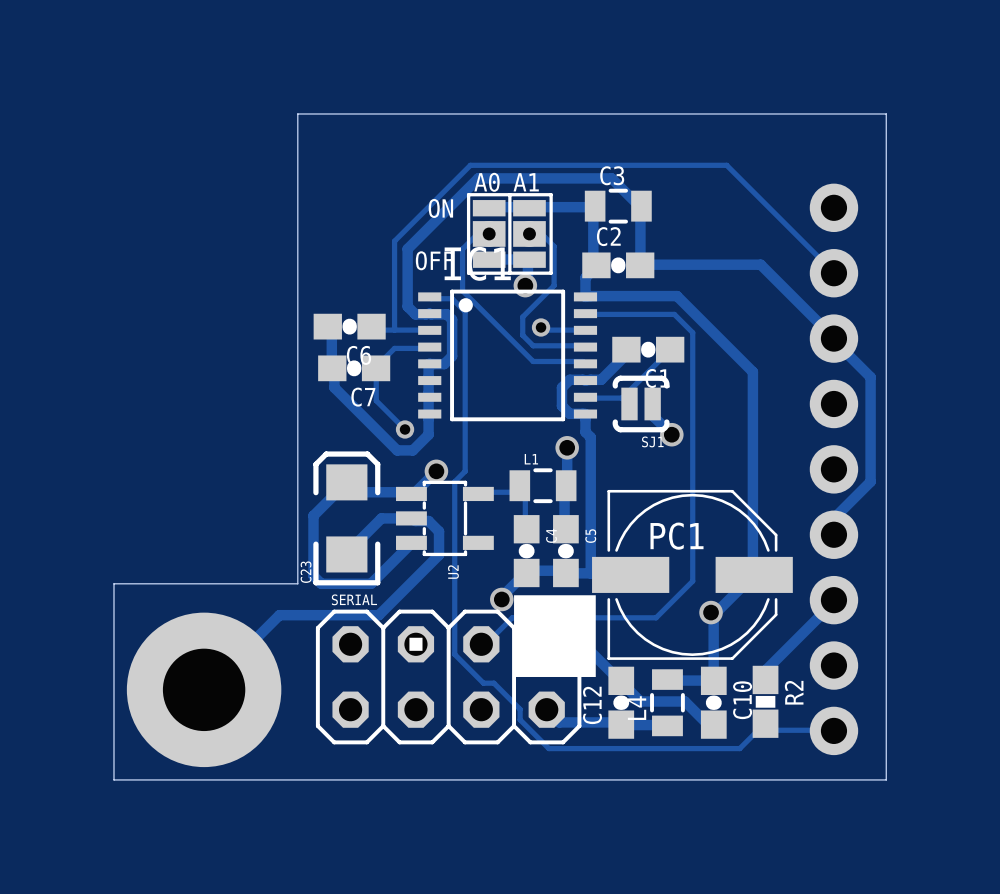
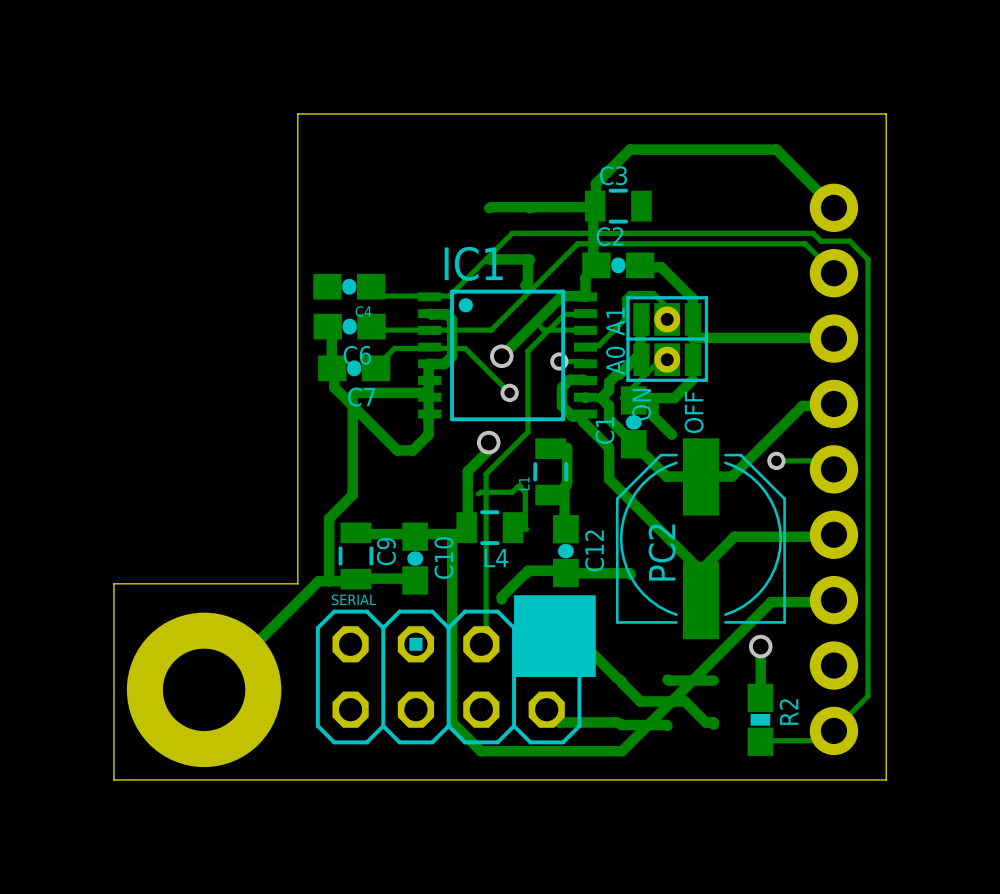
track: none -> (595, 206) (595, 183) (629, 149) (776, 149) (833, 207)
track: (488, 233) (488, 235) (475, 235) (462, 249) (462, 290) (533, 361) (559, 361) -> none
part rotation: 0° (509, 233) -> 90° counterclockwise (667, 339)
part position: (509, 233) -> (667, 339)
track: (527, 233) (530, 235) (543, 235) (554, 246) (554, 285) (522, 317) (522, 335) (533, 345) (585, 347) -> (666, 319) (666, 306) (653, 293) (629, 293) (624, 298) (624, 319) (598, 345) (585, 347)
track: (805, 243) (726, 165) (470, 165) (394, 241) (394, 330) -> (805, 243) (577, 243) (491, 330) (429, 330)
via: (525, 285) -> none
track: (429, 296) (431, 298) (452, 298) (465, 311) (465, 471) (454, 481) (454, 654) (483, 683) (493, 683) (520, 709) (520, 719) (548, 748) (739, 748) (765, 723) (771, 730) (833, 730) -> (371, 286) (381, 296) (449, 296) (512, 233) (813, 233) (820, 241) (849, 241) (867, 259) (867, 696) (833, 730)
track: (585, 296) (677, 296) (752, 371) (754, 574) (713, 615) -> (585, 296) (561, 296) (501, 356)
track: (429, 313) (415, 314) (407, 306) (407, 249) (478, 178) (611, 178) (641, 206) (640, 265) (760, 264) (833, 337) -> none
track: (585, 313) (674, 314) (692, 332) -> (640, 265) (640, 267) (661, 267) (692, 298) (692, 332)
track: none -> (641, 319) (641, 359) (635, 358) (619, 374) (616, 374) (609, 382) (609, 390) (601, 398) (609, 405) (609, 419) (666, 476) (731, 476) (802, 405) (833, 405) (833, 403)
via: (541, 327) -> none
track: (833, 338) (870, 377) (870, 481) (833, 518) (833, 534) -> (833, 337) (692, 337)
track: none -> (429, 347) (465, 348) (509, 392)
track: (626, 349) (624, 356) (601, 379) (585, 380) -> none
C1 rotation: 0° (648, 349) -> 90° clockwise (633, 422)
C1 position: (648, 349) -> (633, 422)
via: none -> (501, 356)
via: none -> (559, 361)
track: (376, 368) (376, 400) (405, 429) -> none
track: (692, 379) (692, 581) (656, 617) (512, 617) (483, 646) (481, 644) -> (585, 313) (564, 314) (527, 351) (527, 432) (486, 473) (486, 641) (481, 644)
track: none -> (692, 379) (674, 398) (635, 398) (633, 400)
via: none -> (509, 392)
track: none -> (429, 397) (423, 392) (355, 392) (352, 395) (352, 494) (329, 518) (329, 581)
track: (622, 398) (601, 398) -> none
SJ1: (641, 403) -> none
track: (569, 413) (585, 414) (585, 432) (590, 437) (590, 573) -> (569, 413) (572, 416) (582, 416) (582, 421) (609, 447) (609, 479) (700, 570) (700, 600) (703, 568) (734, 536) (833, 536) (833, 534)
via: (405, 429) -> none
via: (671, 434) -> none
track: none -> (488, 442) (488, 450) (467, 471) (467, 523) (466, 527) (459, 534) (415, 534) (415, 536) (410, 534) (355, 532)
via: none -> (488, 442)
via: (567, 447) -> none
track: none -> (776, 460) (826, 460) (833, 469)
via: none -> (776, 460)
track: (436, 471) (411, 493) (410, 492) (357, 492) (346, 482) (313, 515) (313, 575) (321, 583) (371, 583) (411, 542) -> none
via: (436, 471) -> none
L1 rotation: 0° (543, 485) -> 90° clockwise (550, 471)
C23: (346, 518) -> none
U2: (444, 518) -> none
C5 name: C5 (590, 536) -> C12 (594, 550)
PC2: none -> (700, 538)
C4 rotation: 0° (526, 551) -> 90° clockwise (349, 286)
C4 position: (526, 551) -> (349, 286)
track: (346, 554) (381, 518) (411, 518) (415, 521) (428, 521) (439, 531) (439, 555) (378, 615) (279, 615) (206, 688) -> (415, 580) (412, 578) (357, 578) (352, 581) (318, 581) (211, 688) (206, 688)
C9: none -> (355, 556)
PC1: (692, 574) -> none
via: (501, 599) -> none
track: (833, 602) (765, 670) (765, 679) -> (833, 602) (771, 602) (622, 751) (480, 751) (452, 722) (452, 534)
via position: (711, 612) -> (760, 646)
track: (713, 615) (713, 680) -> none
track: none -> (760, 646) (760, 697)
R2 position: (765, 701) -> (760, 719)
C12: (621, 702) -> none
L4 rotation: 0° (667, 702) -> 90° clockwise (489, 527)
L4 position: (667, 702) -> (489, 527)
C10 position: (713, 702) -> (415, 558)
track: none -> (833, 730) (826, 740) (760, 741)

